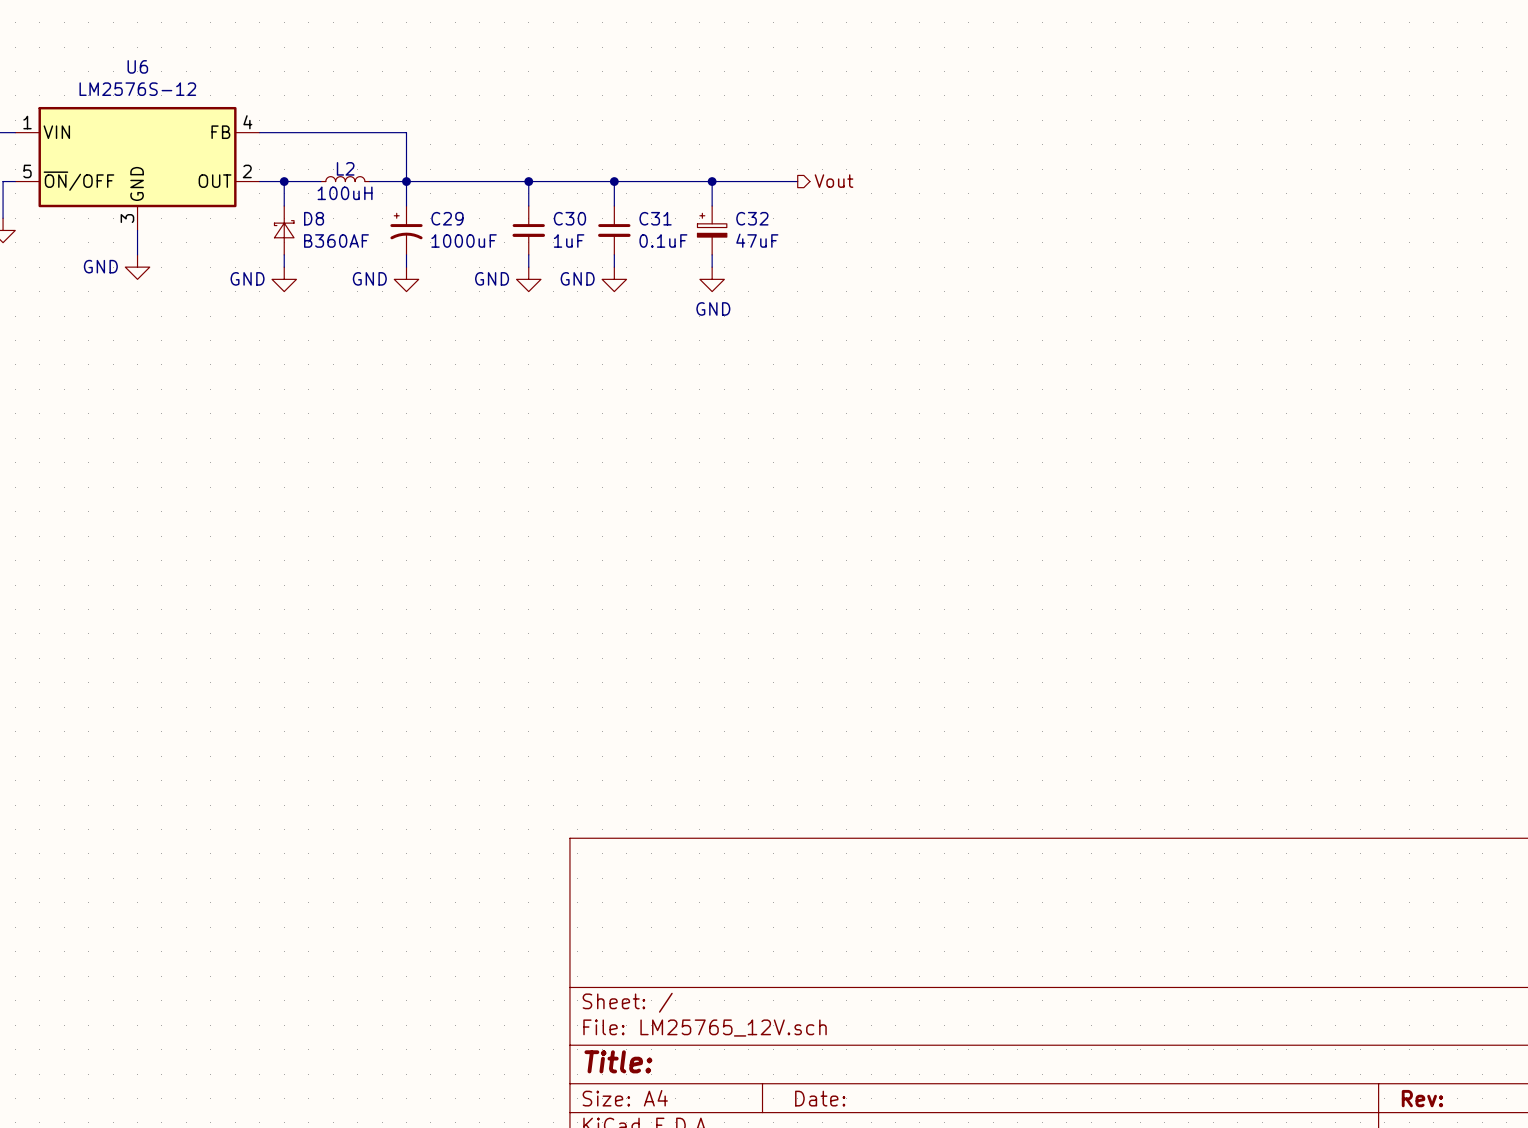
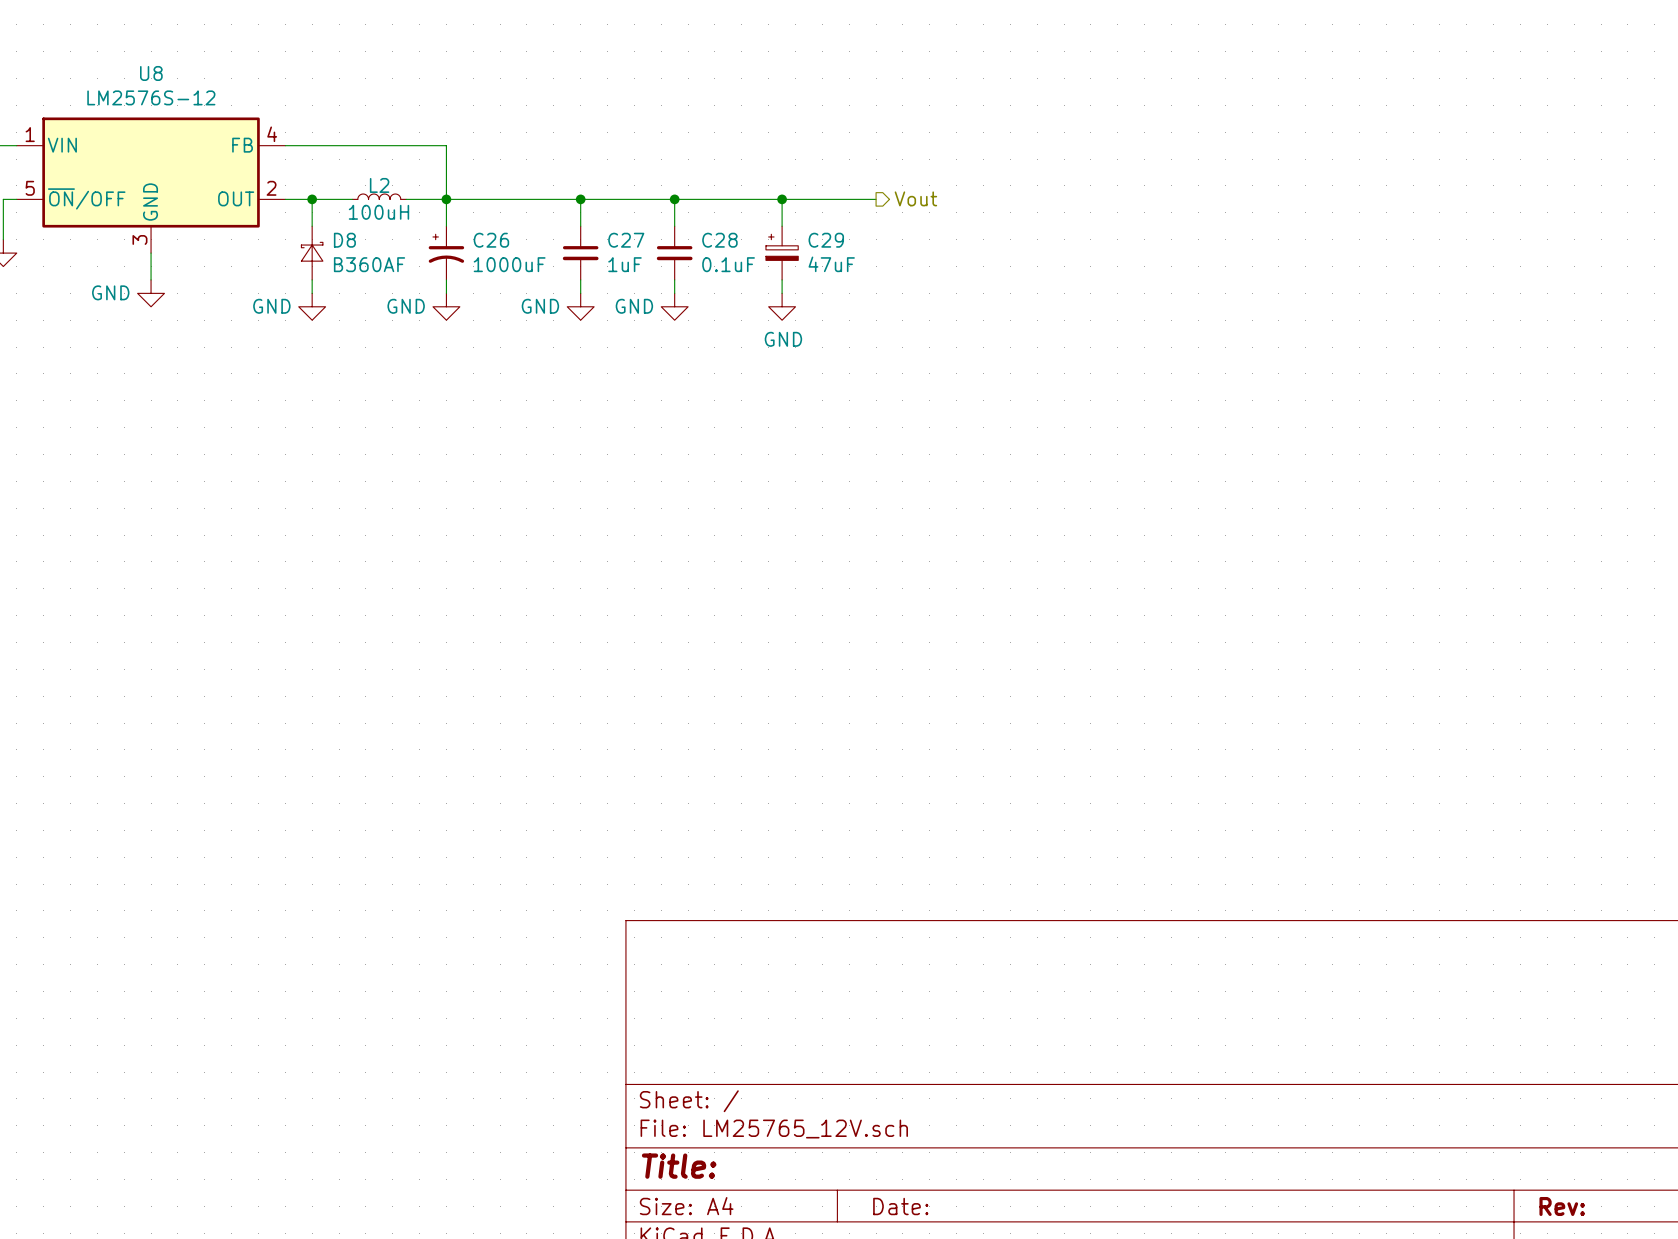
U6 name: U6 (137, 66) -> U8 (151, 73)
C29 name: C29 (447, 218) -> C26 (491, 240)
C30 name: C30 (569, 218) -> C27 (626, 240)
C31 name: C31 (655, 218) -> C28 (719, 240)
C32 name: C32 (752, 218) -> C29 (826, 240)

